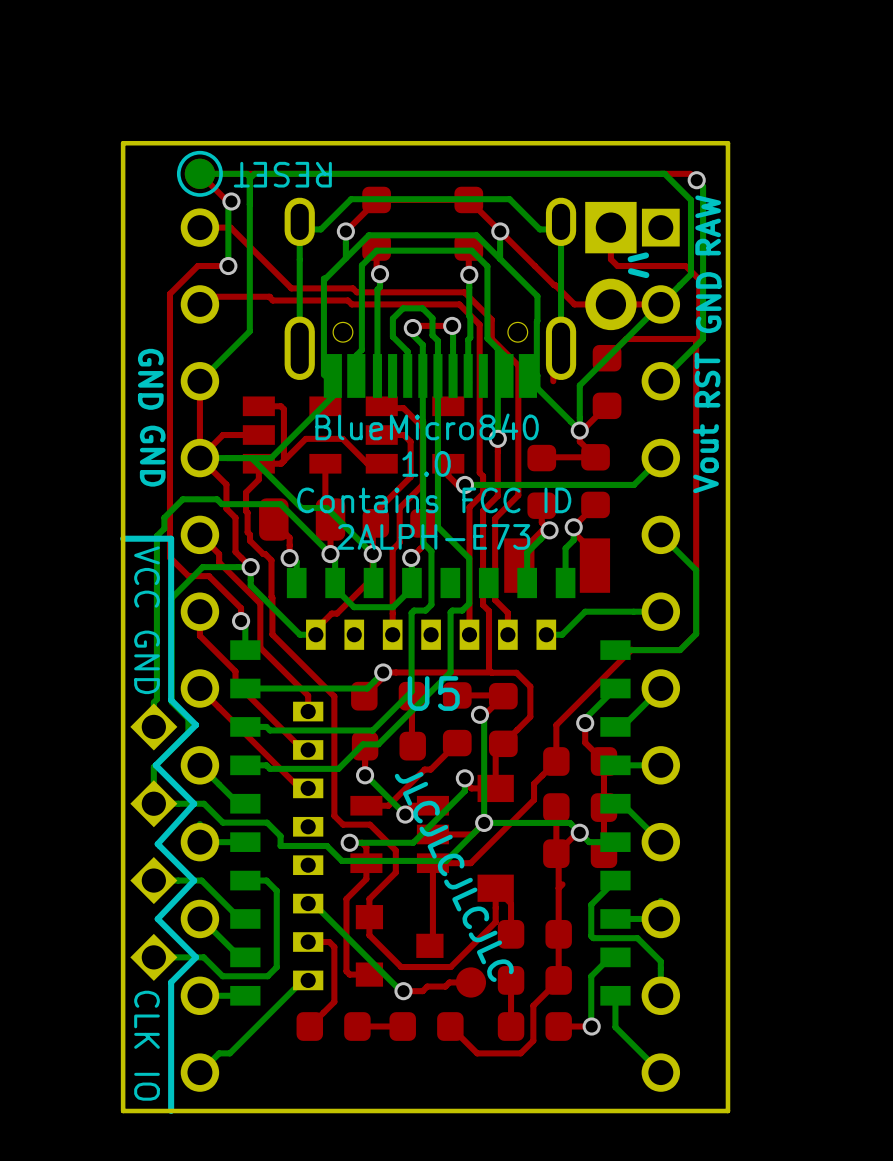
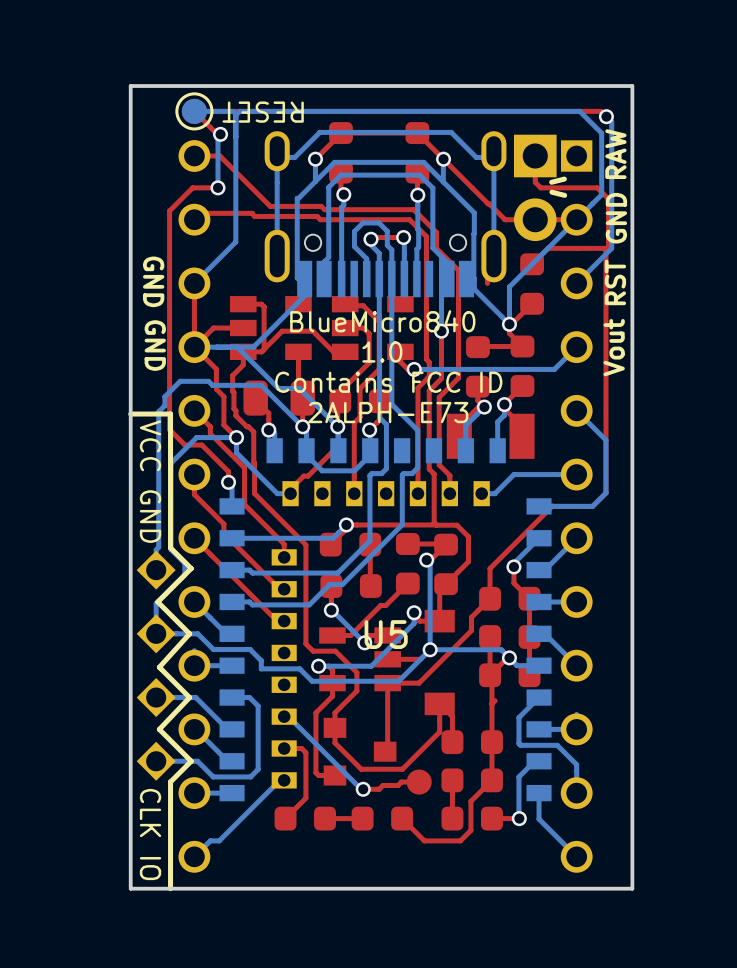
U5 name position: U5 (433, 693) -> U5 (386, 634)
text: JLCJLCJLCJLC (454, 877) -> none

